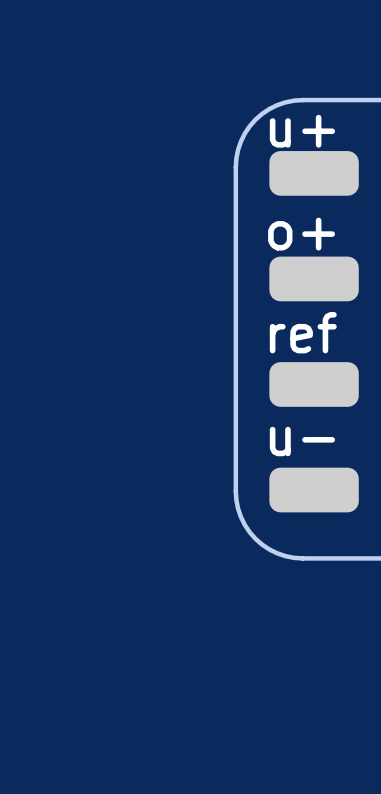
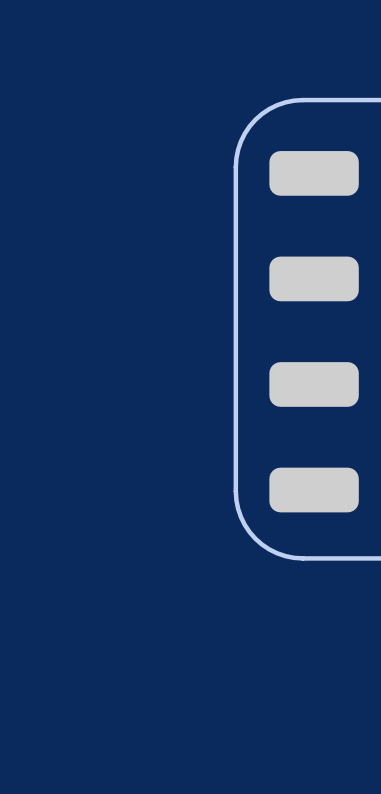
text: u+ (302, 131) -> none
text: o+ (301, 234) -> none
text: ref (303, 332) -> none
text: u- (302, 441) -> none

